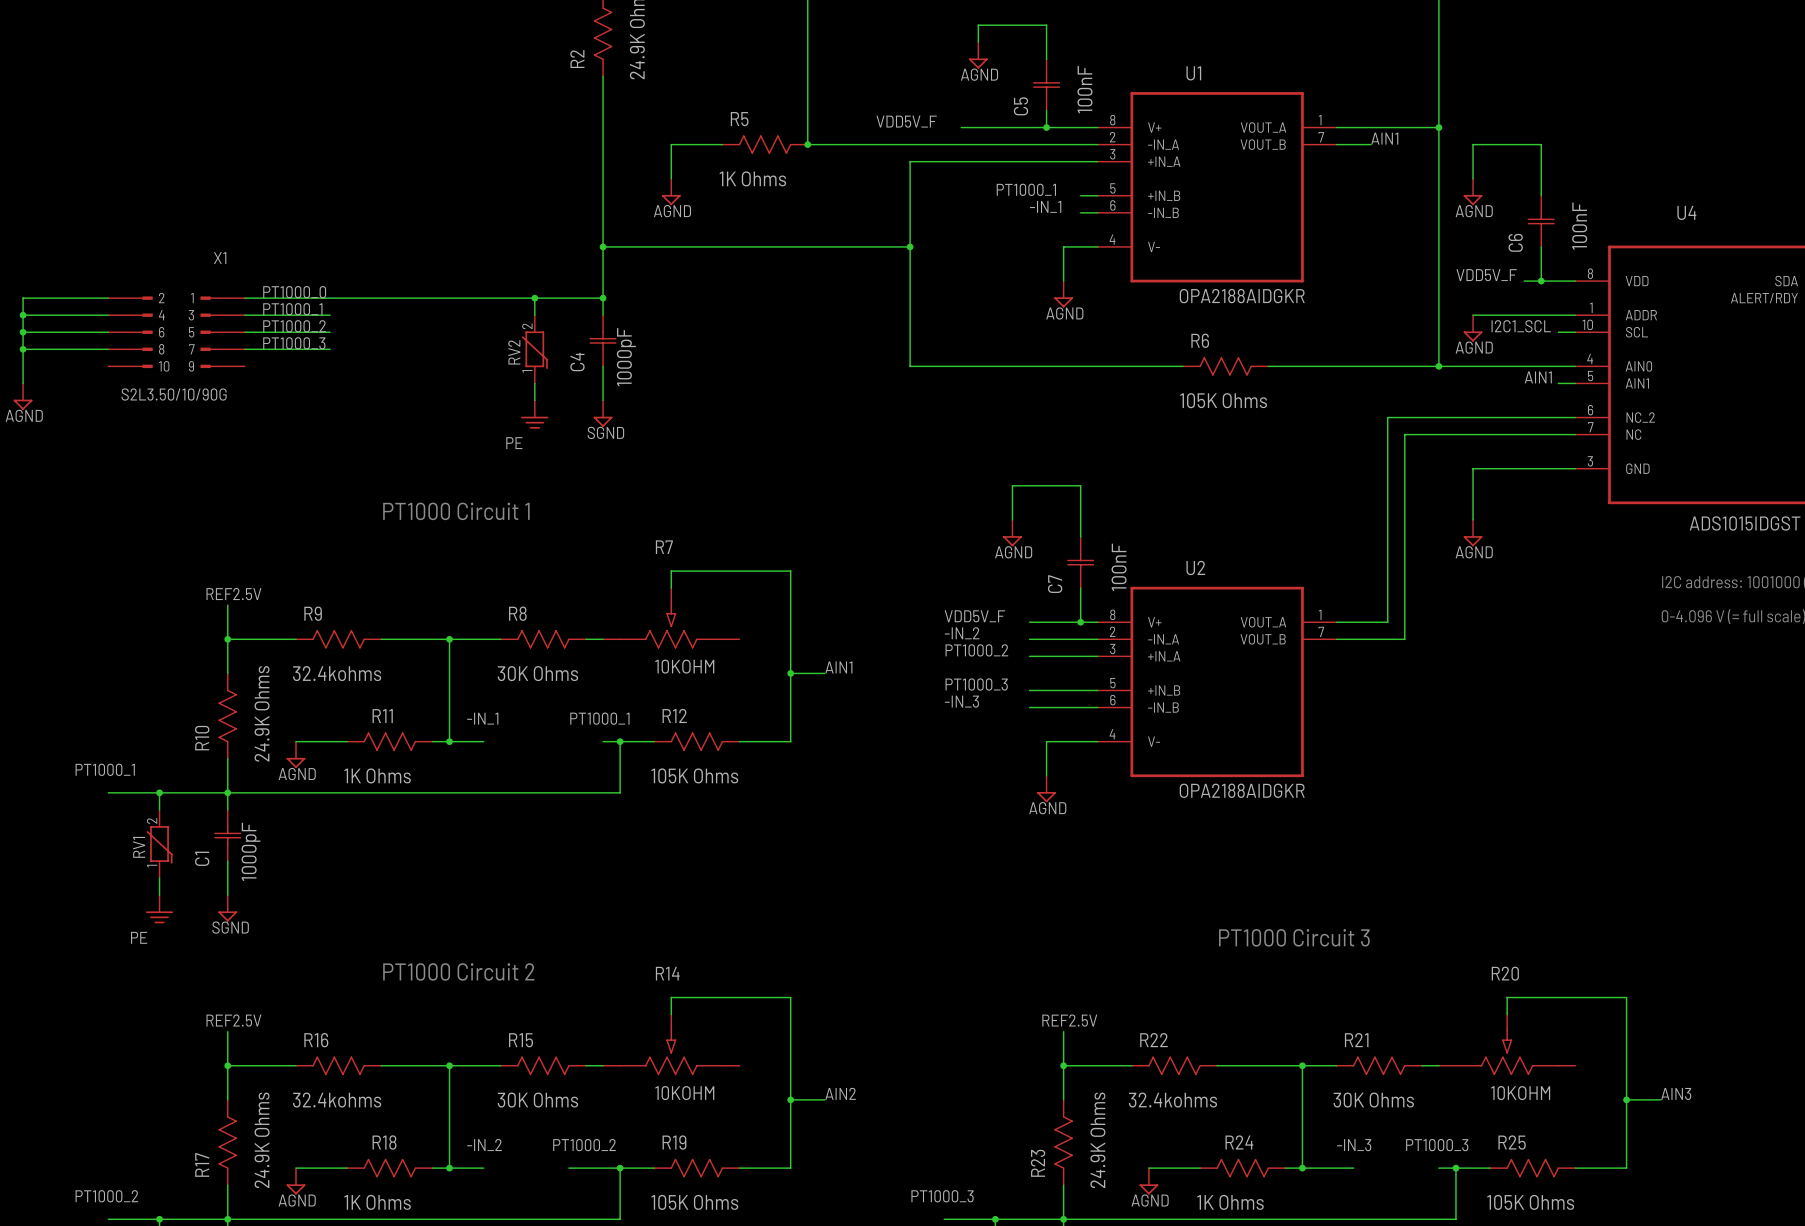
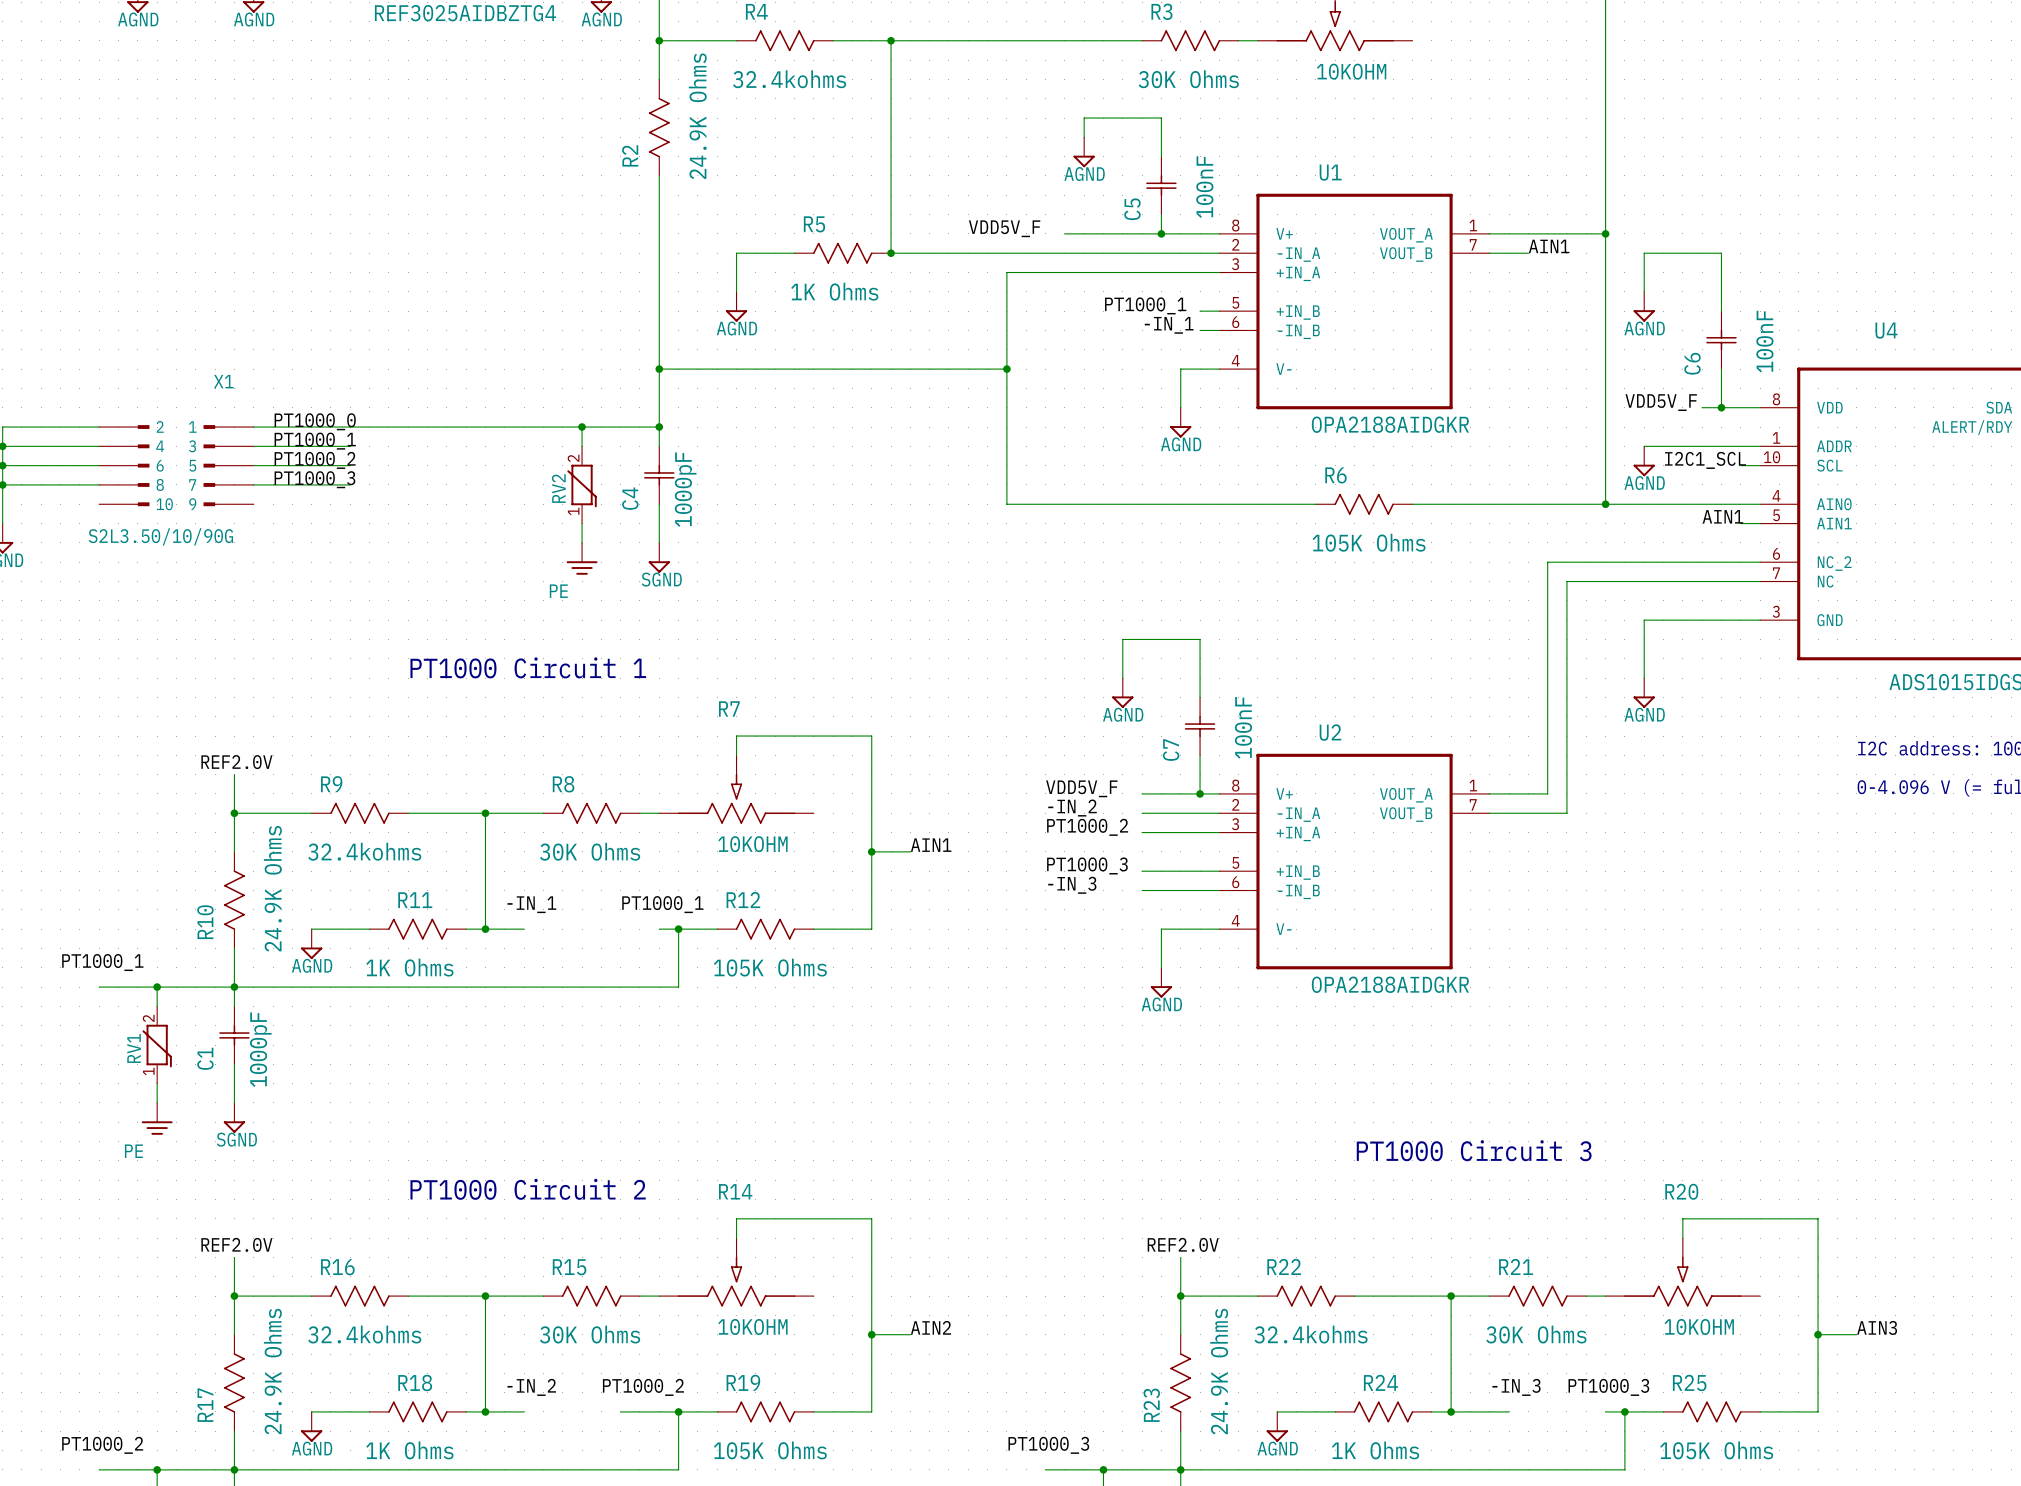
label: REF2.5V (233, 594) -> REF2.0V (236, 762)
label: REF2.5V (233, 1020) -> REF2.0V (236, 1244)
label: REF2.5V (1069, 1020) -> REF2.0V (1183, 1244)

